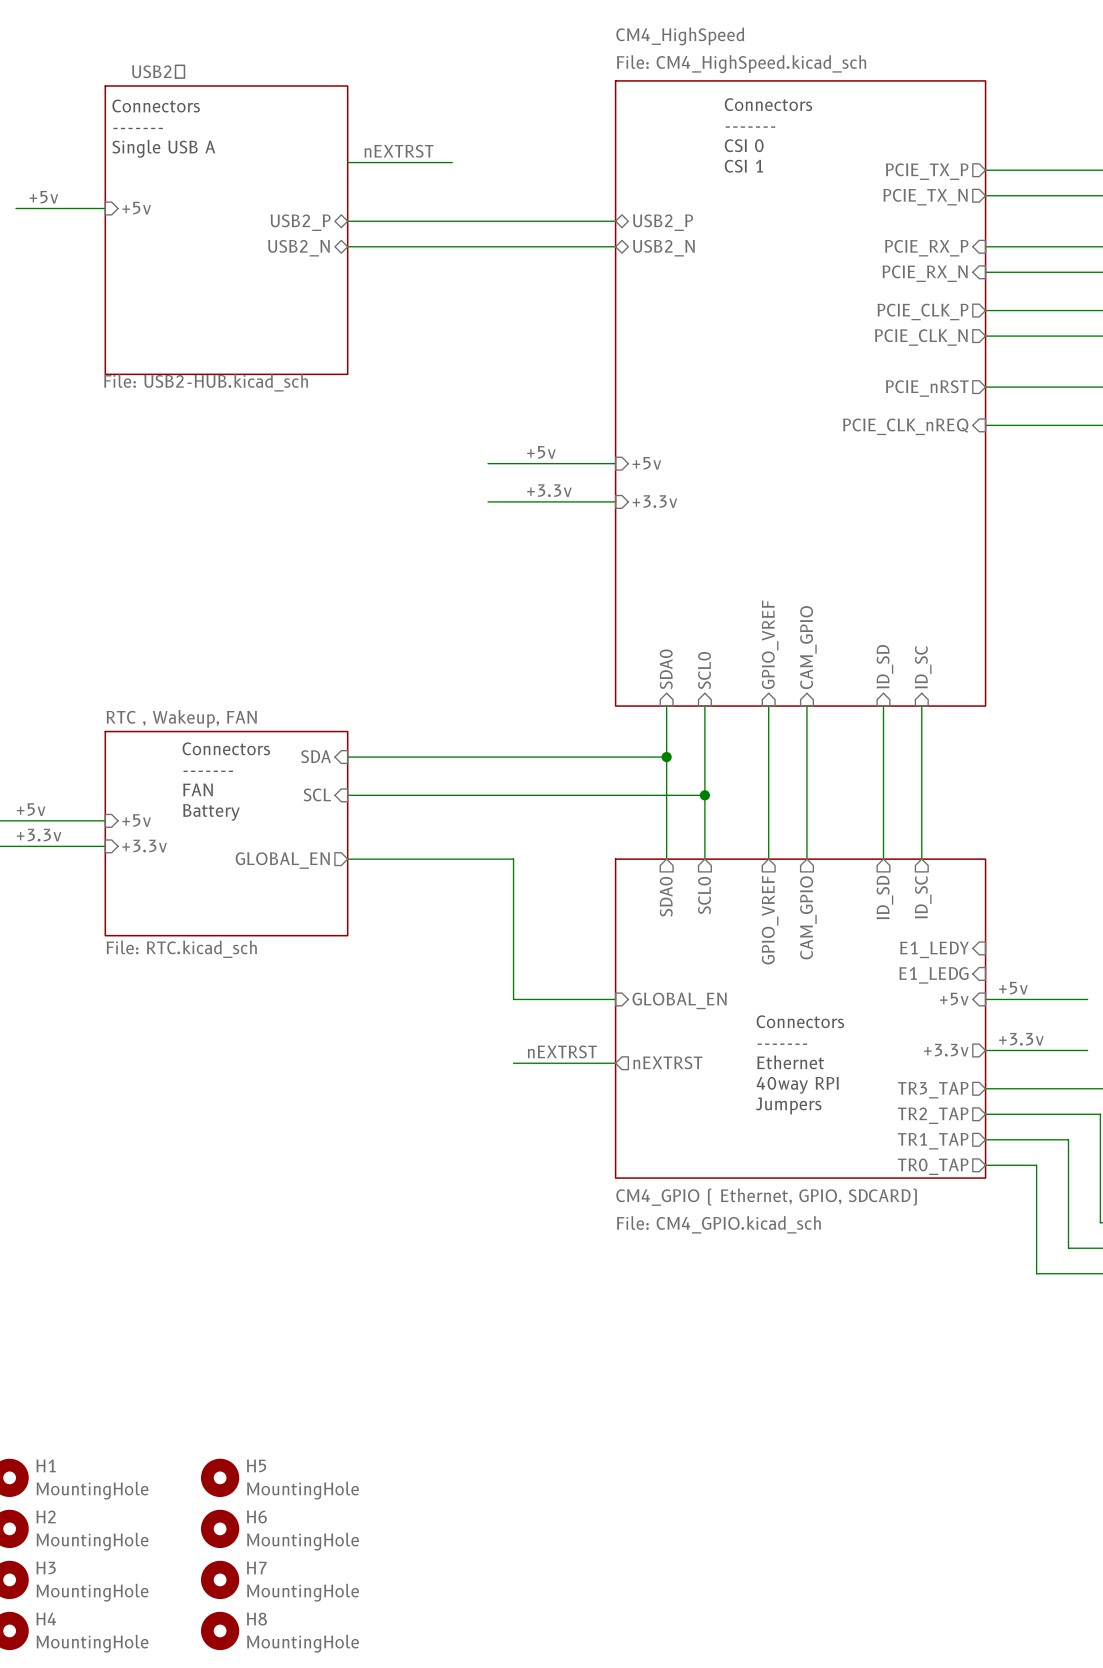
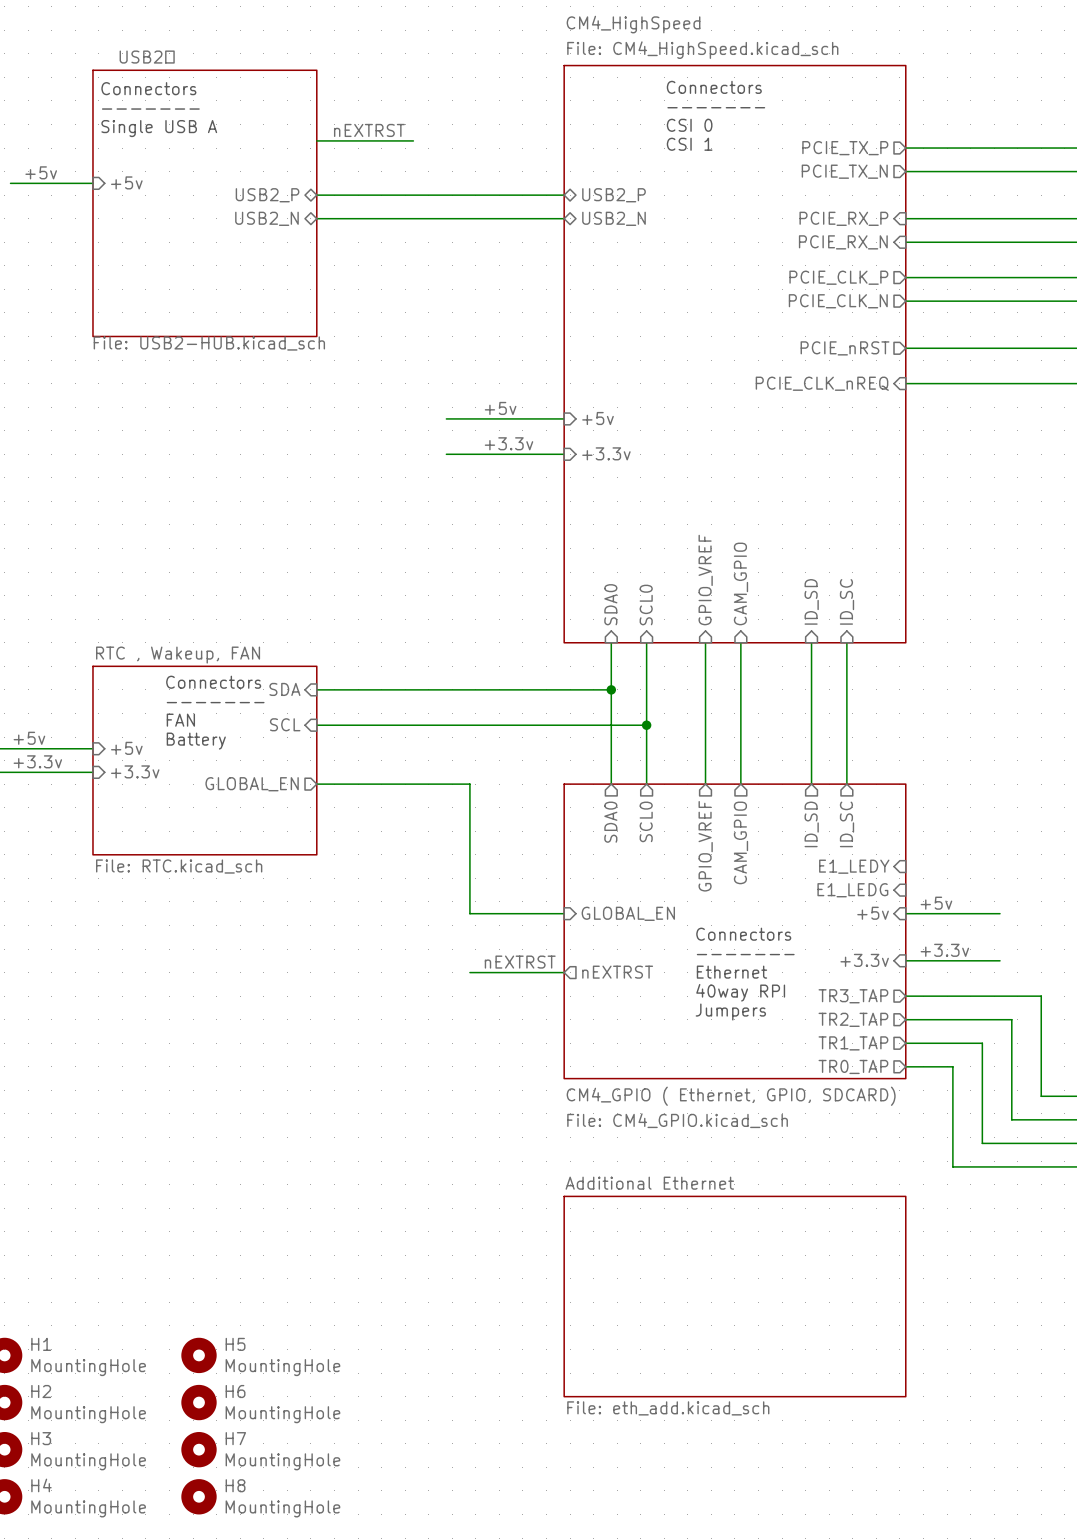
sheet pin shape: output (946, 1050) -> input (864, 960)
sheet Additional Ethernet: none -> File: eth_add.kicad_sch (734, 1296)

